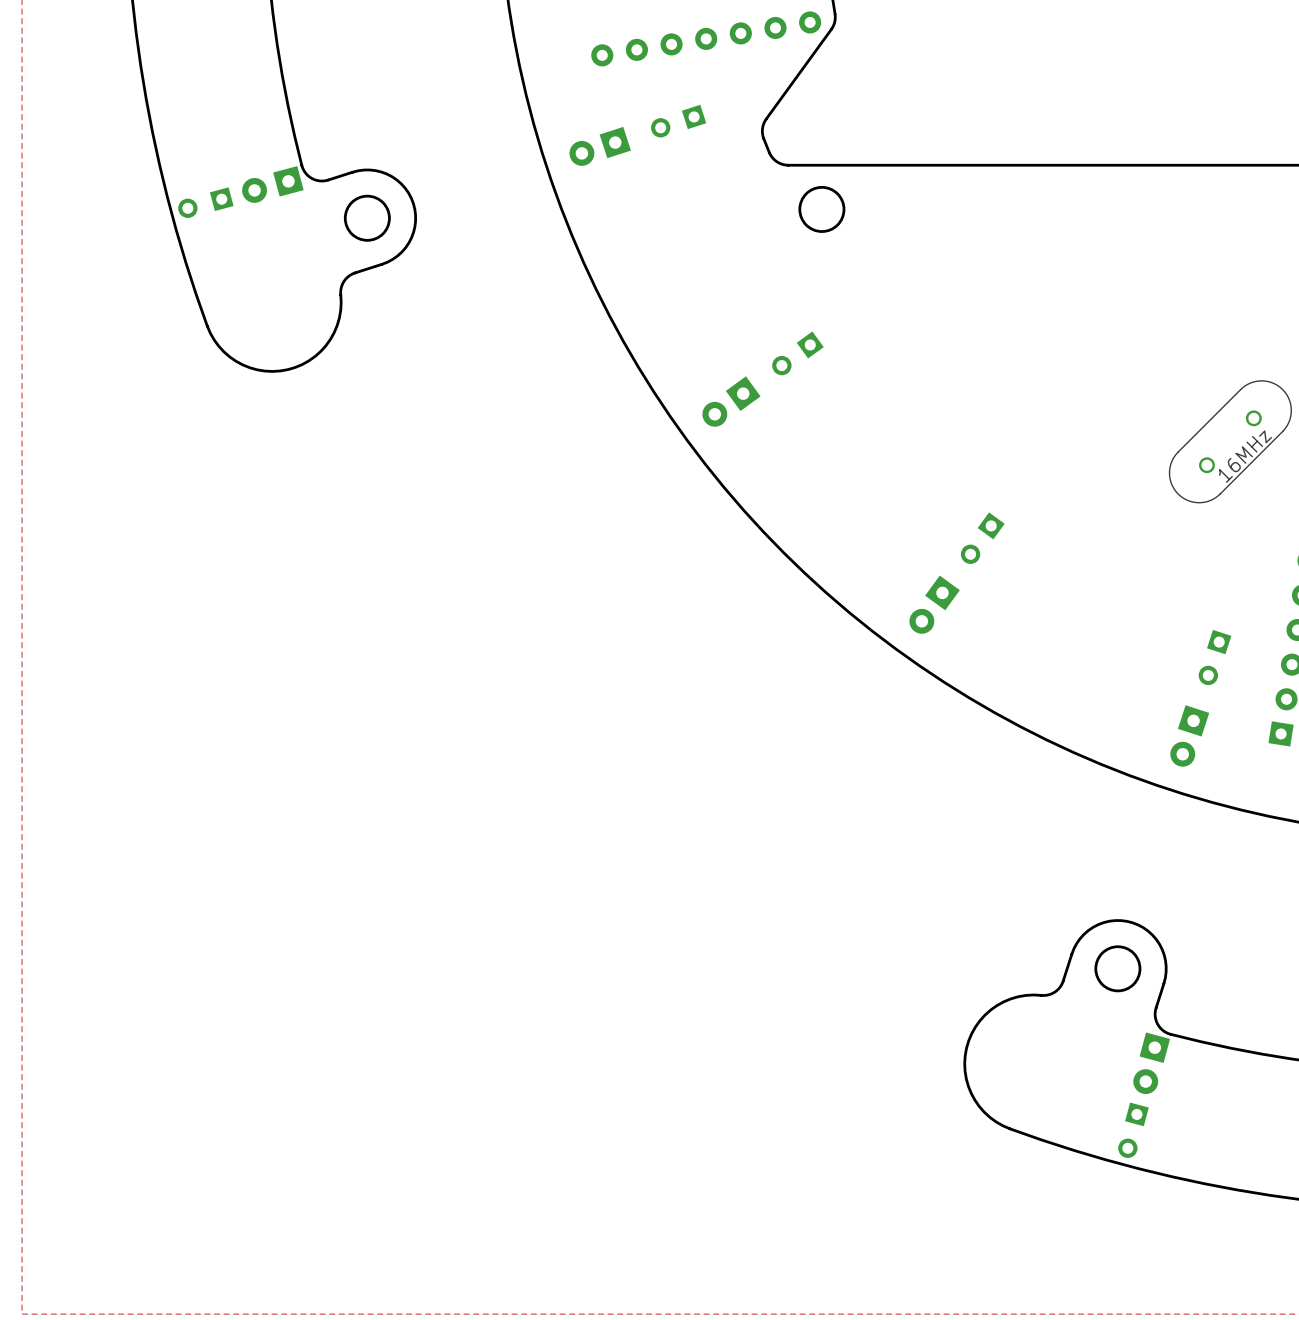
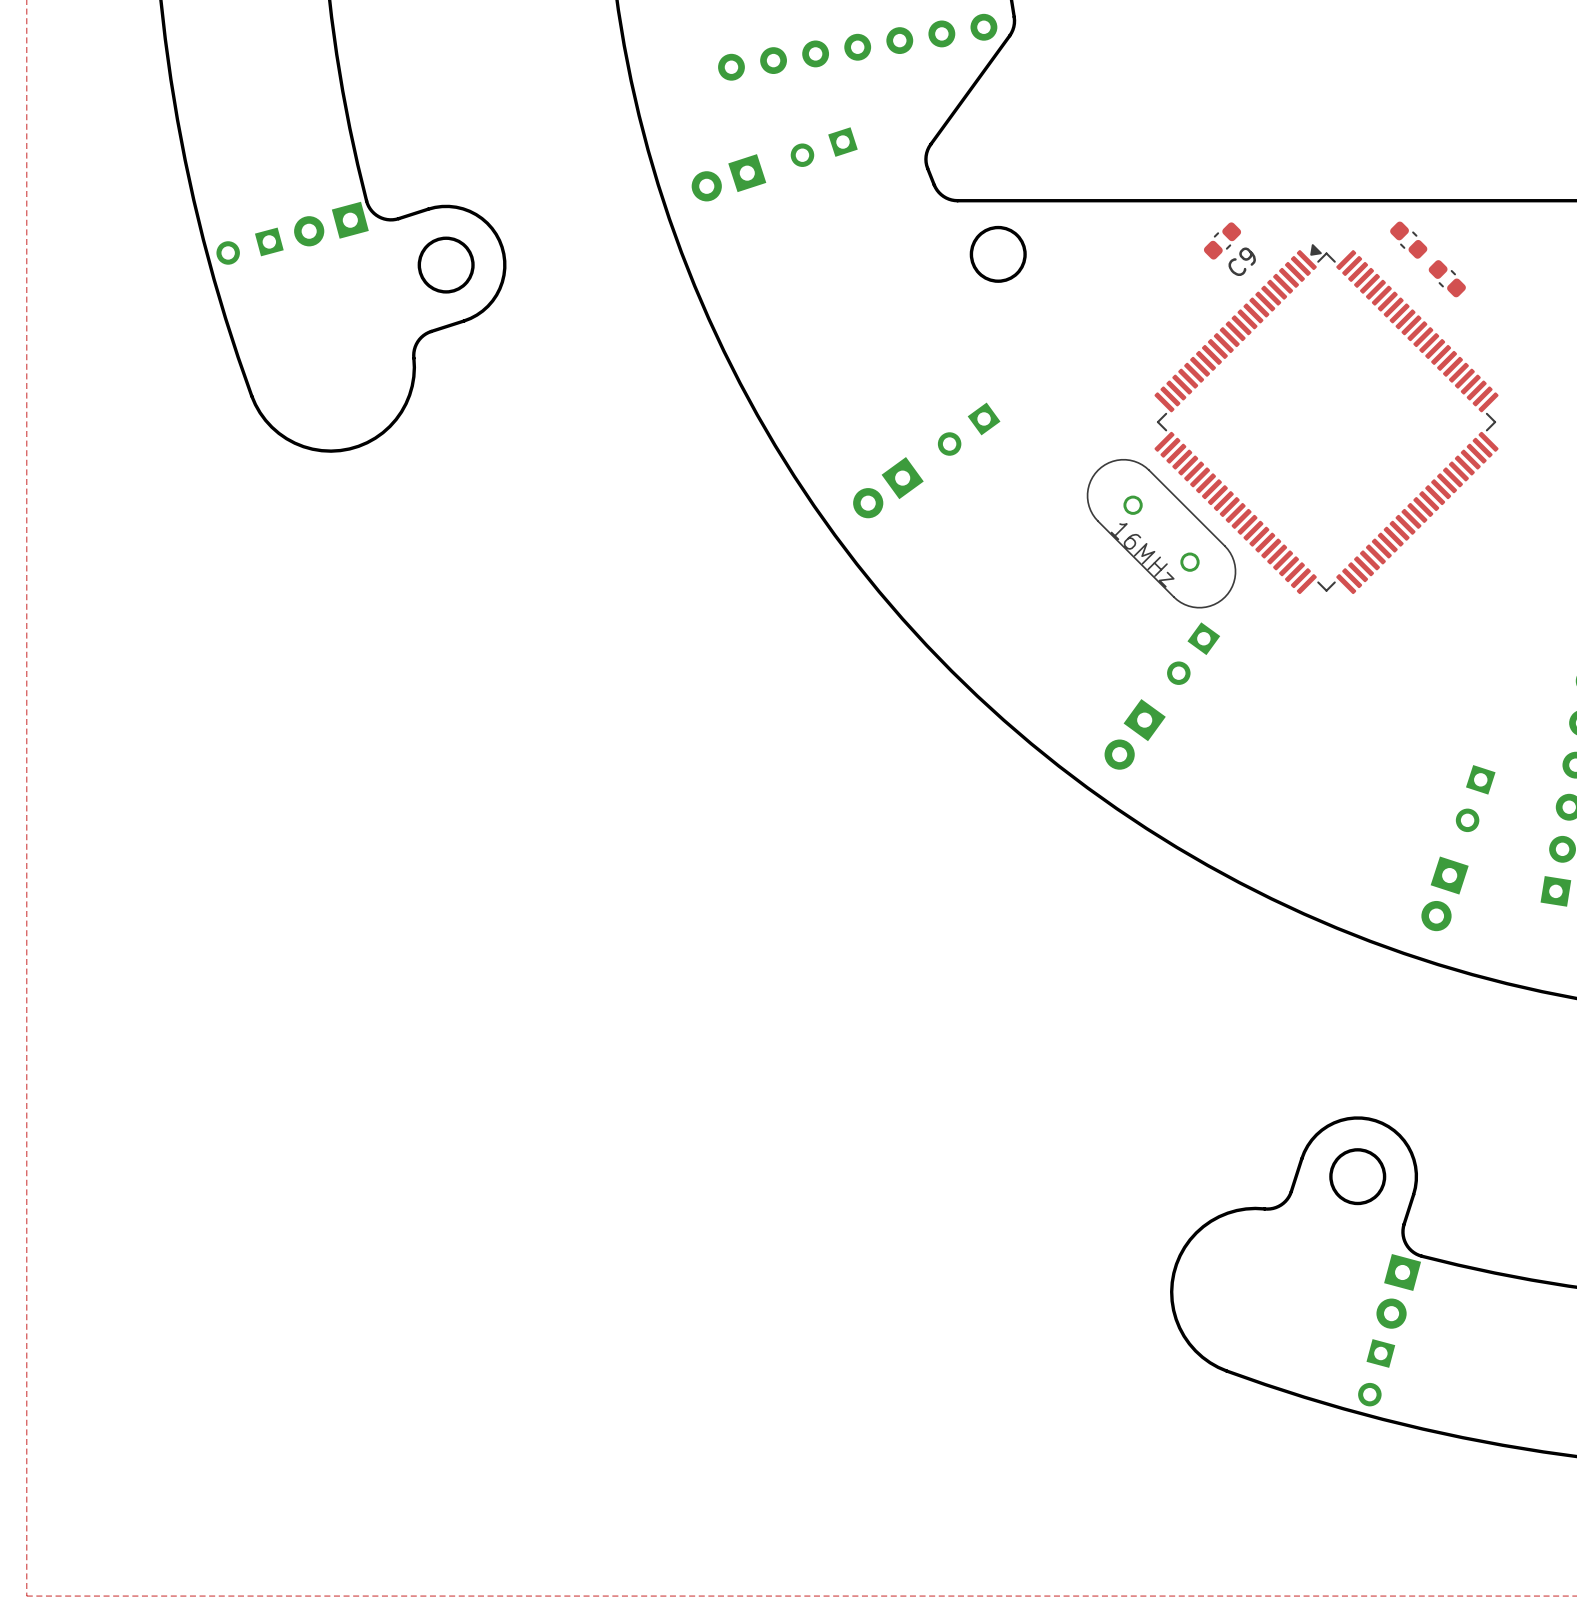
part: none -> (1408, 240)
C9: none -> (1222, 240)
part: none -> (1447, 278)
part: none -> (1326, 419)
16MHz rotation: 0° (1230, 441) -> 90° clockwise (1161, 533)
16MHz position: (1230, 441) -> (1161, 533)

